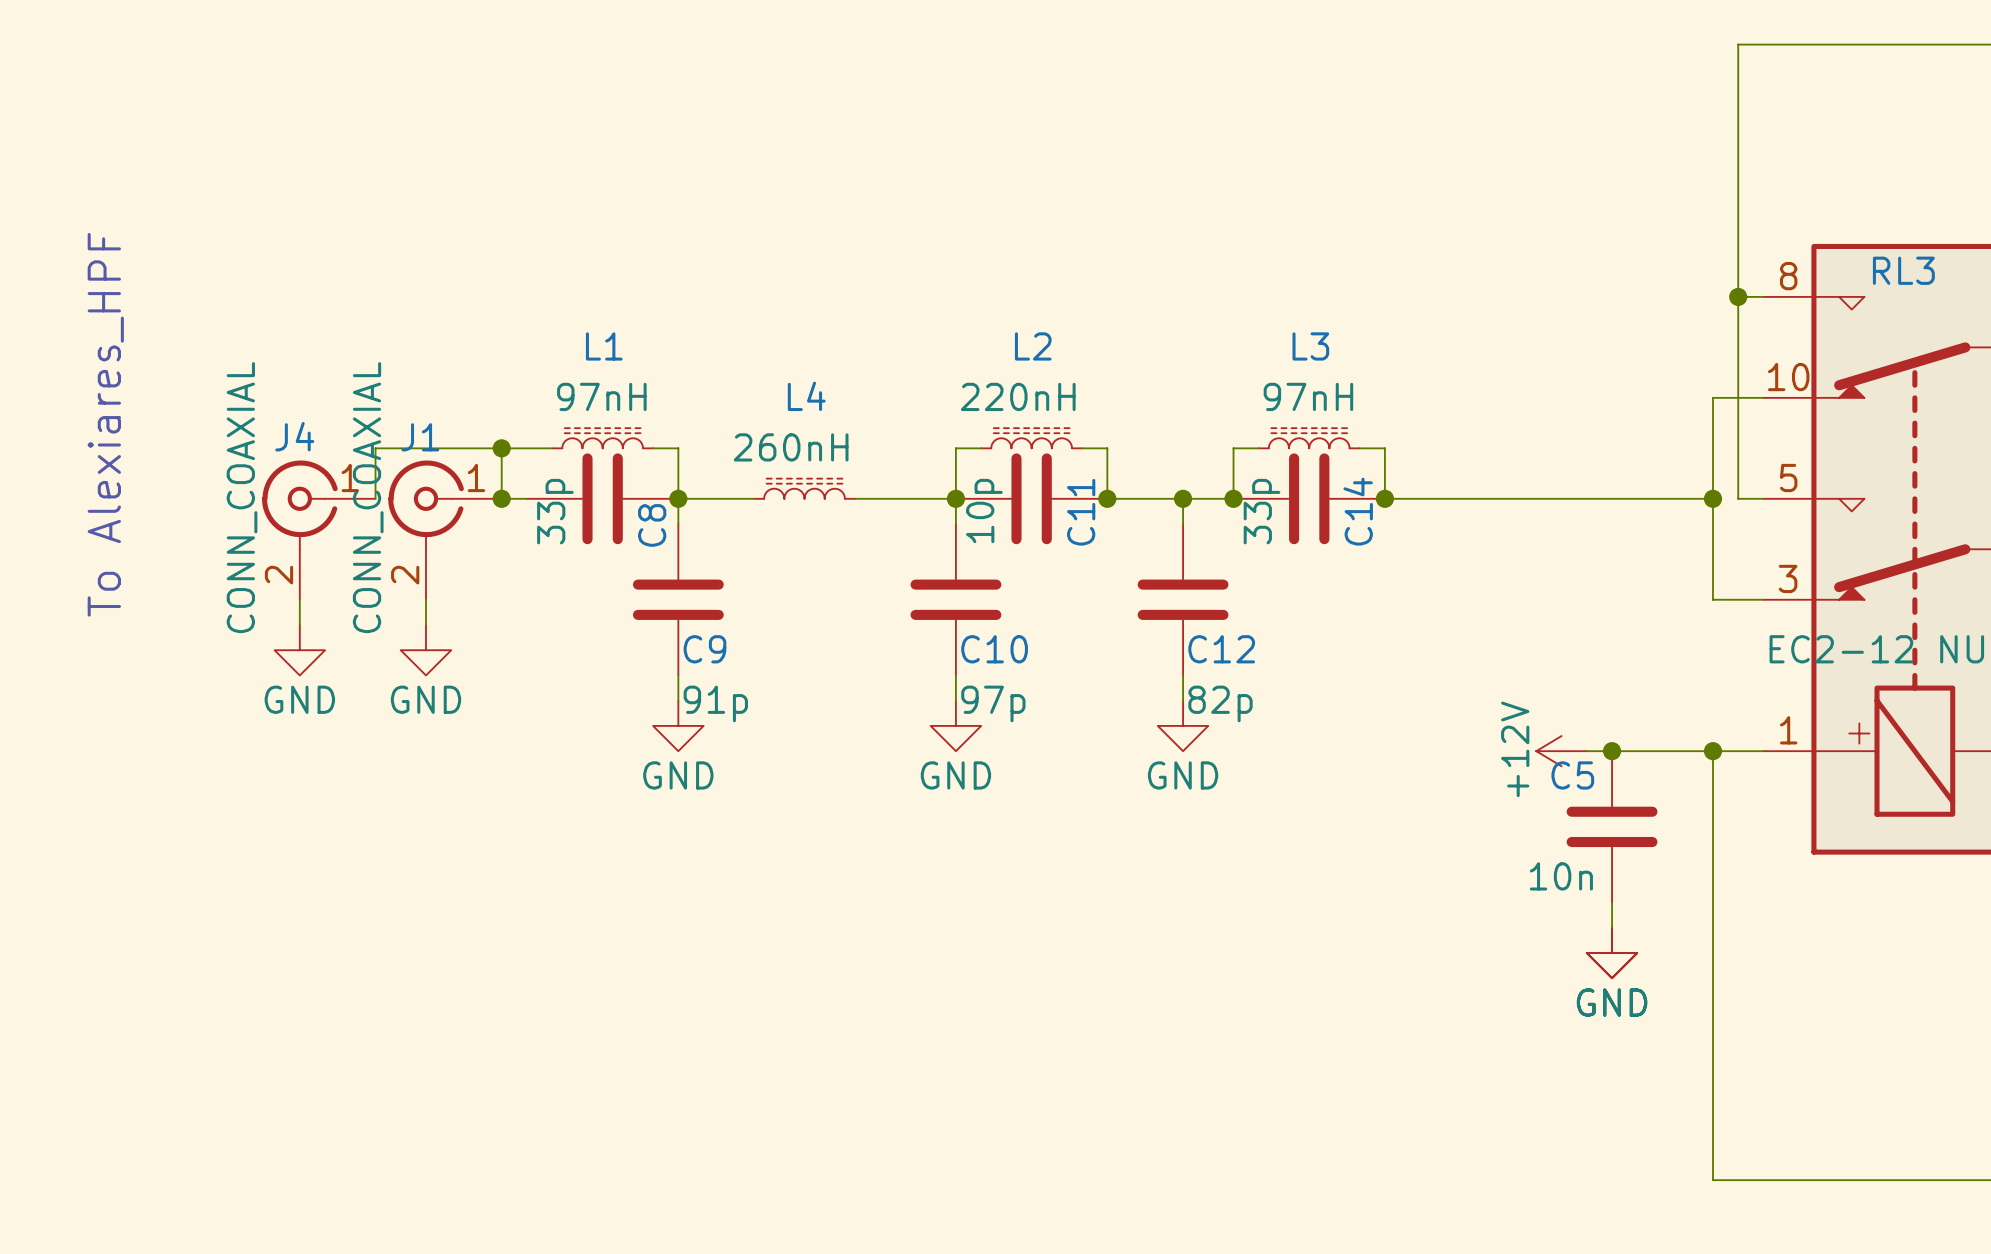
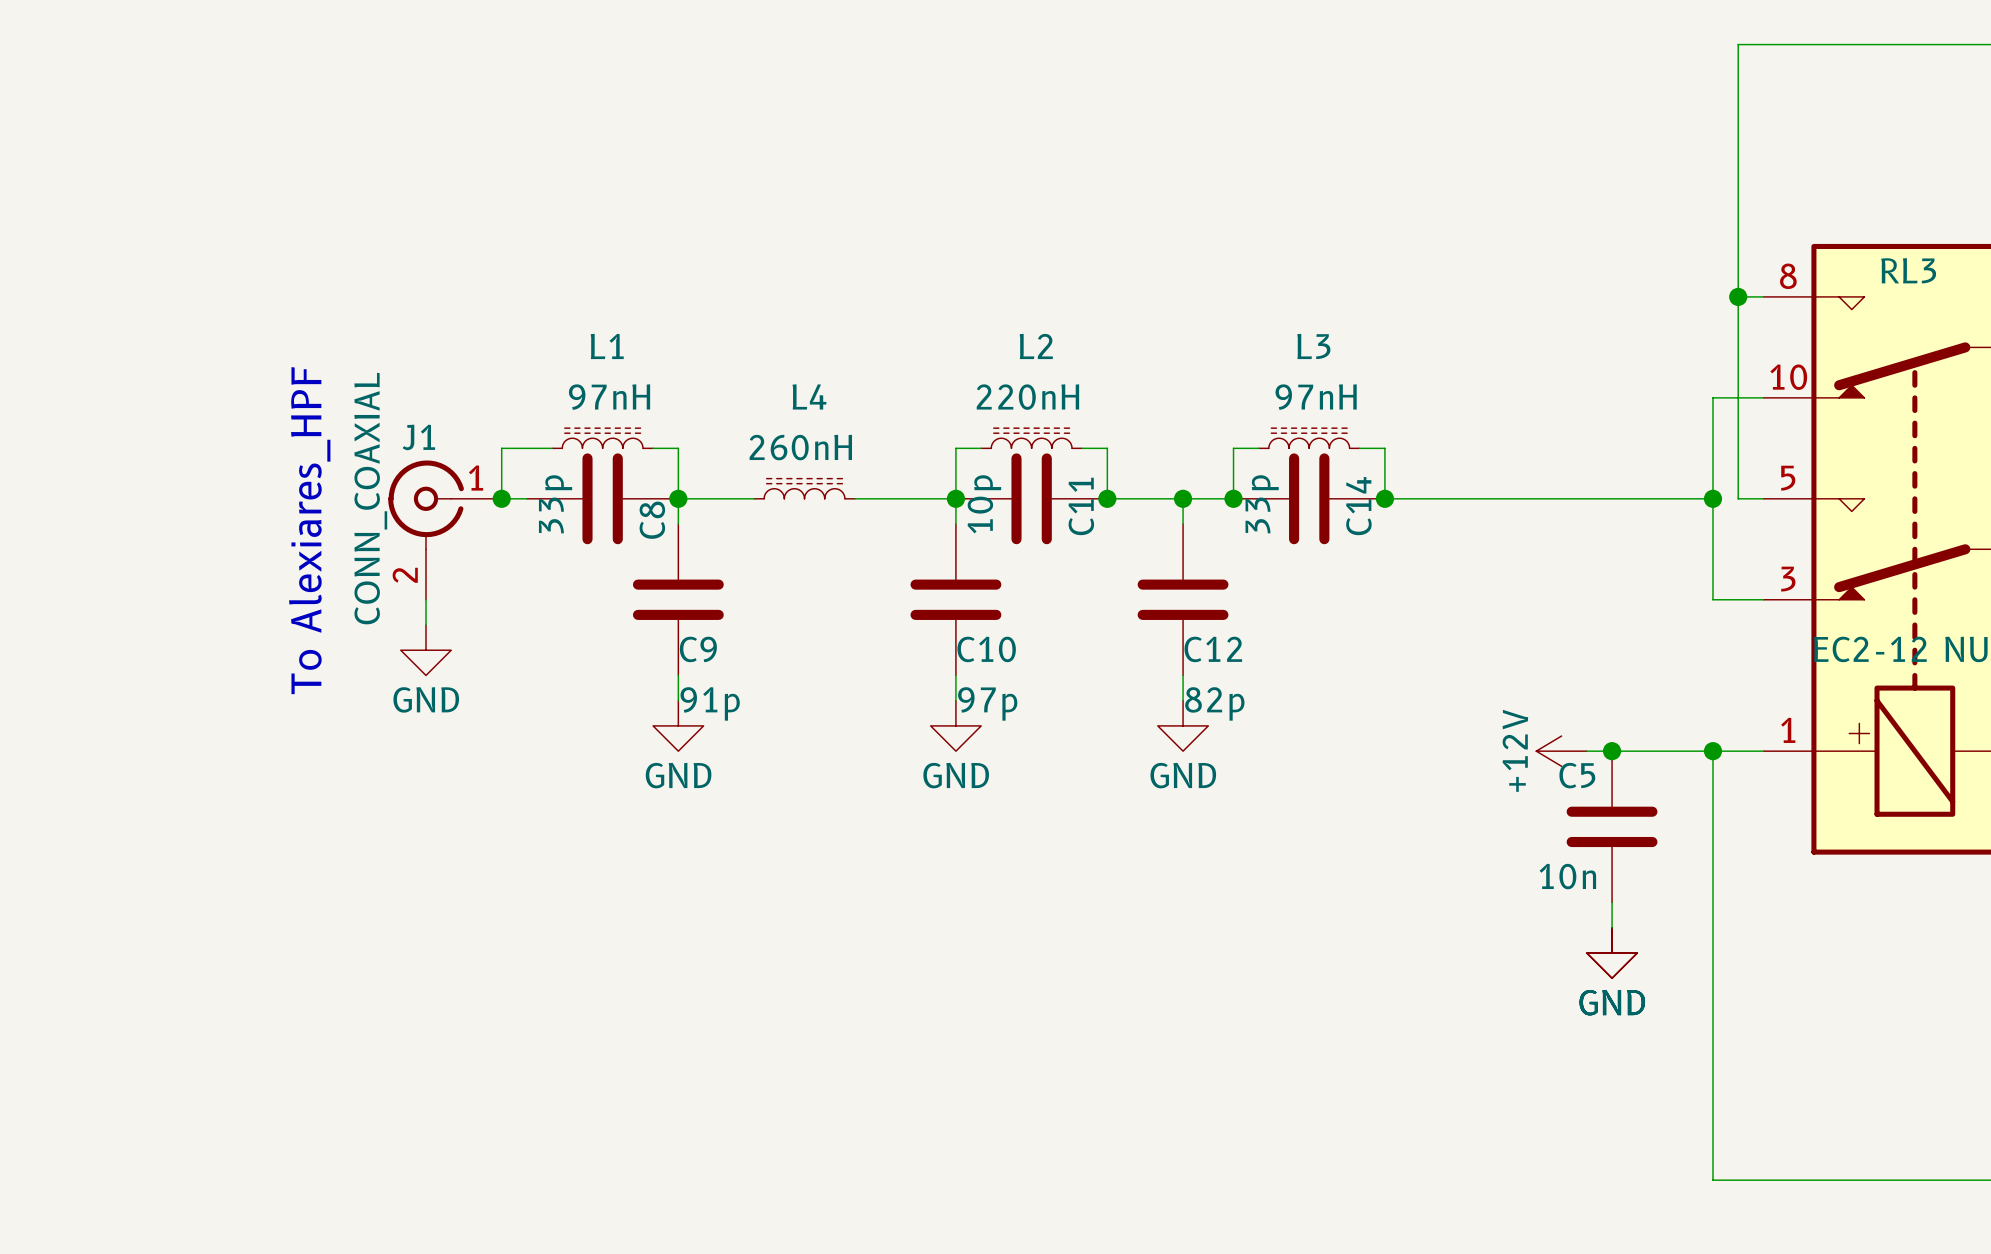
text position: To Alexiares_HPF (105, 424) -> To Alexiares_HPF (309, 530)
wire: (501, 448) (375, 448) (375, 498) -> none
junction: (501, 448) -> none
J4: CONN_COAXIAL (318, 530) -> none
wire: (299, 599) (299, 624) -> none
power symbol: GND (299, 650) -> none

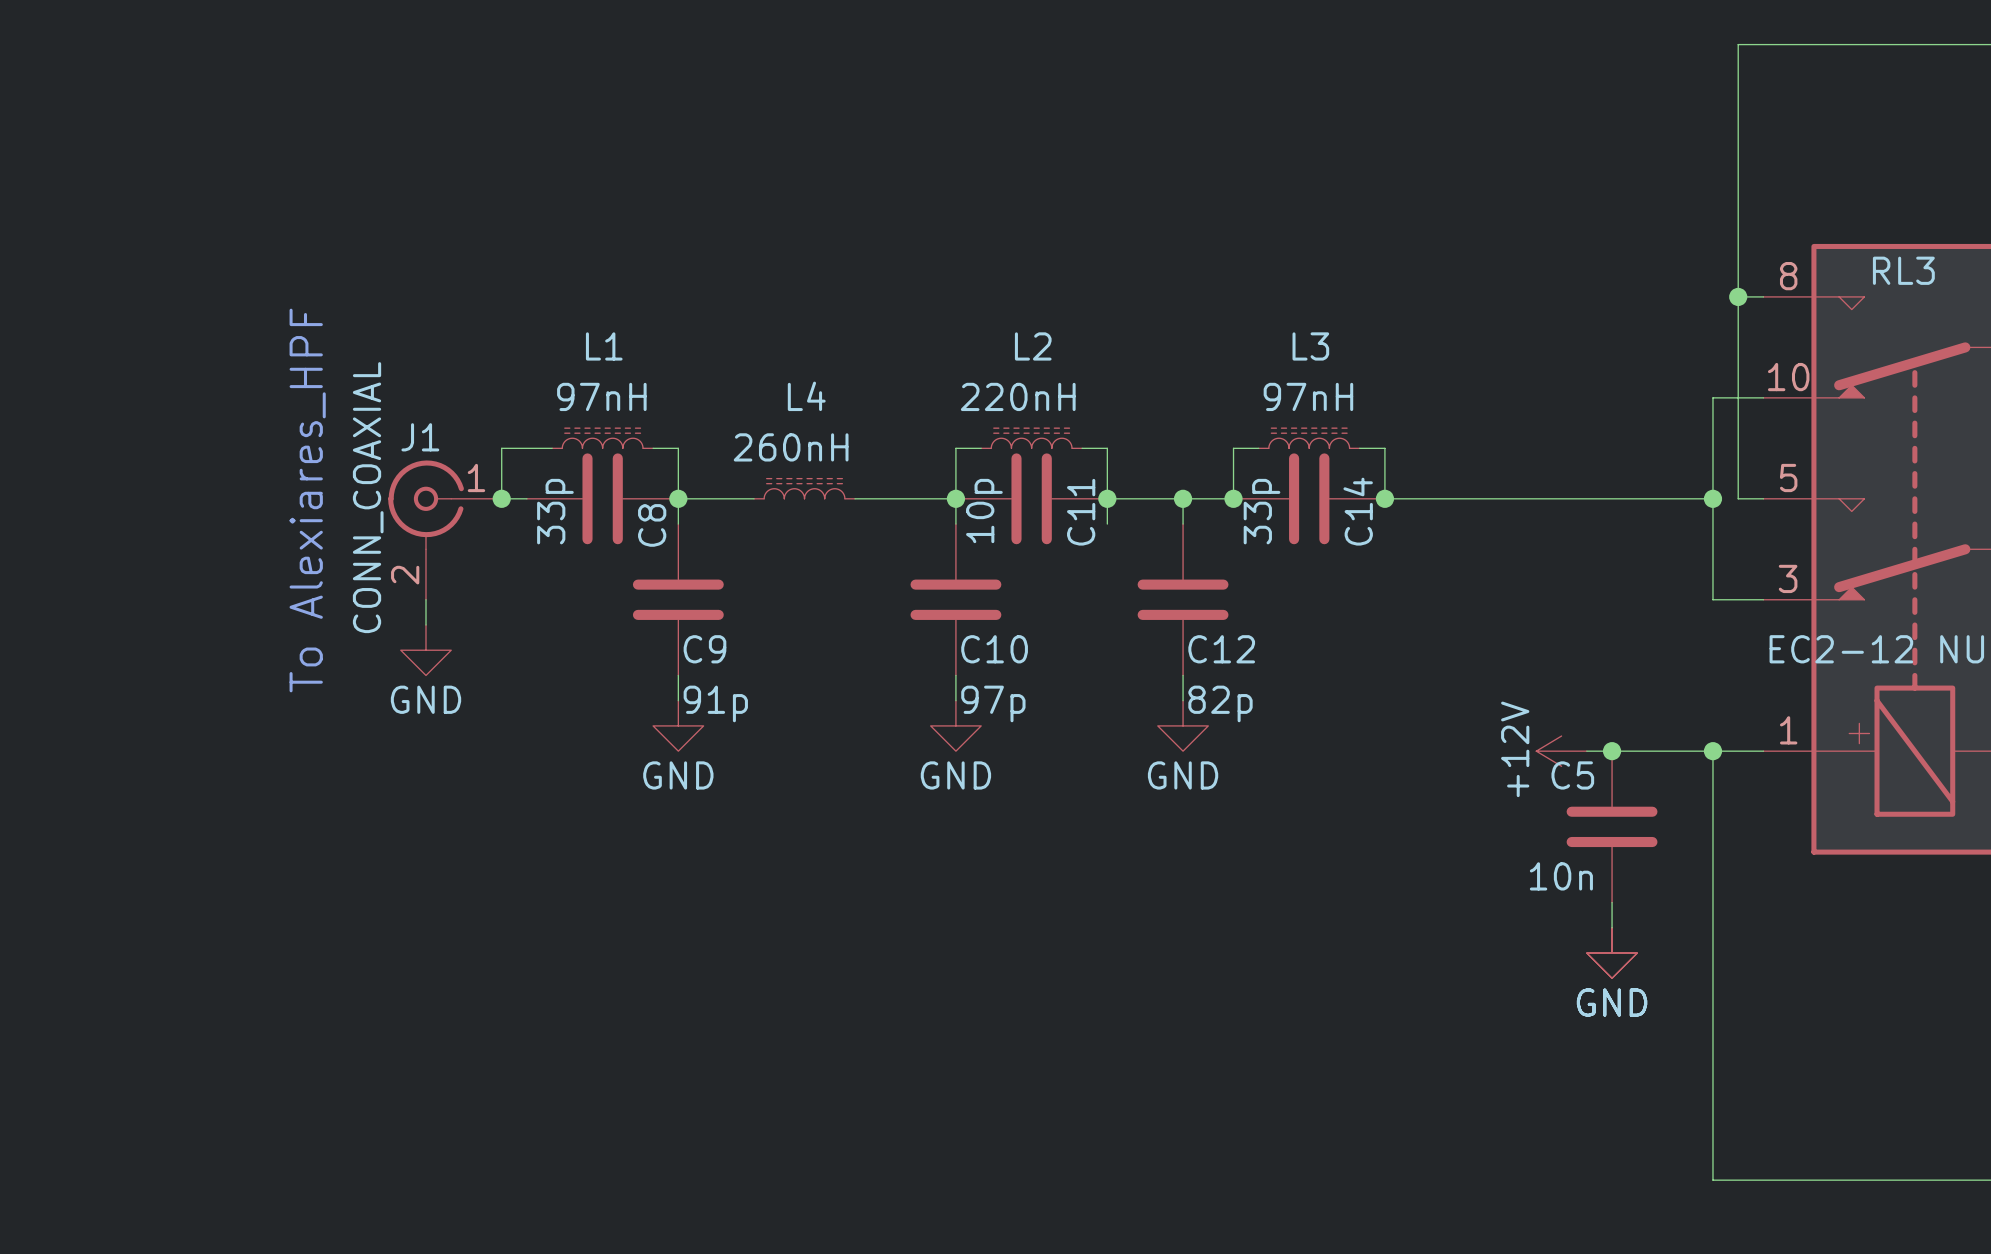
wire: none -> (1107, 498) (1107, 524)

